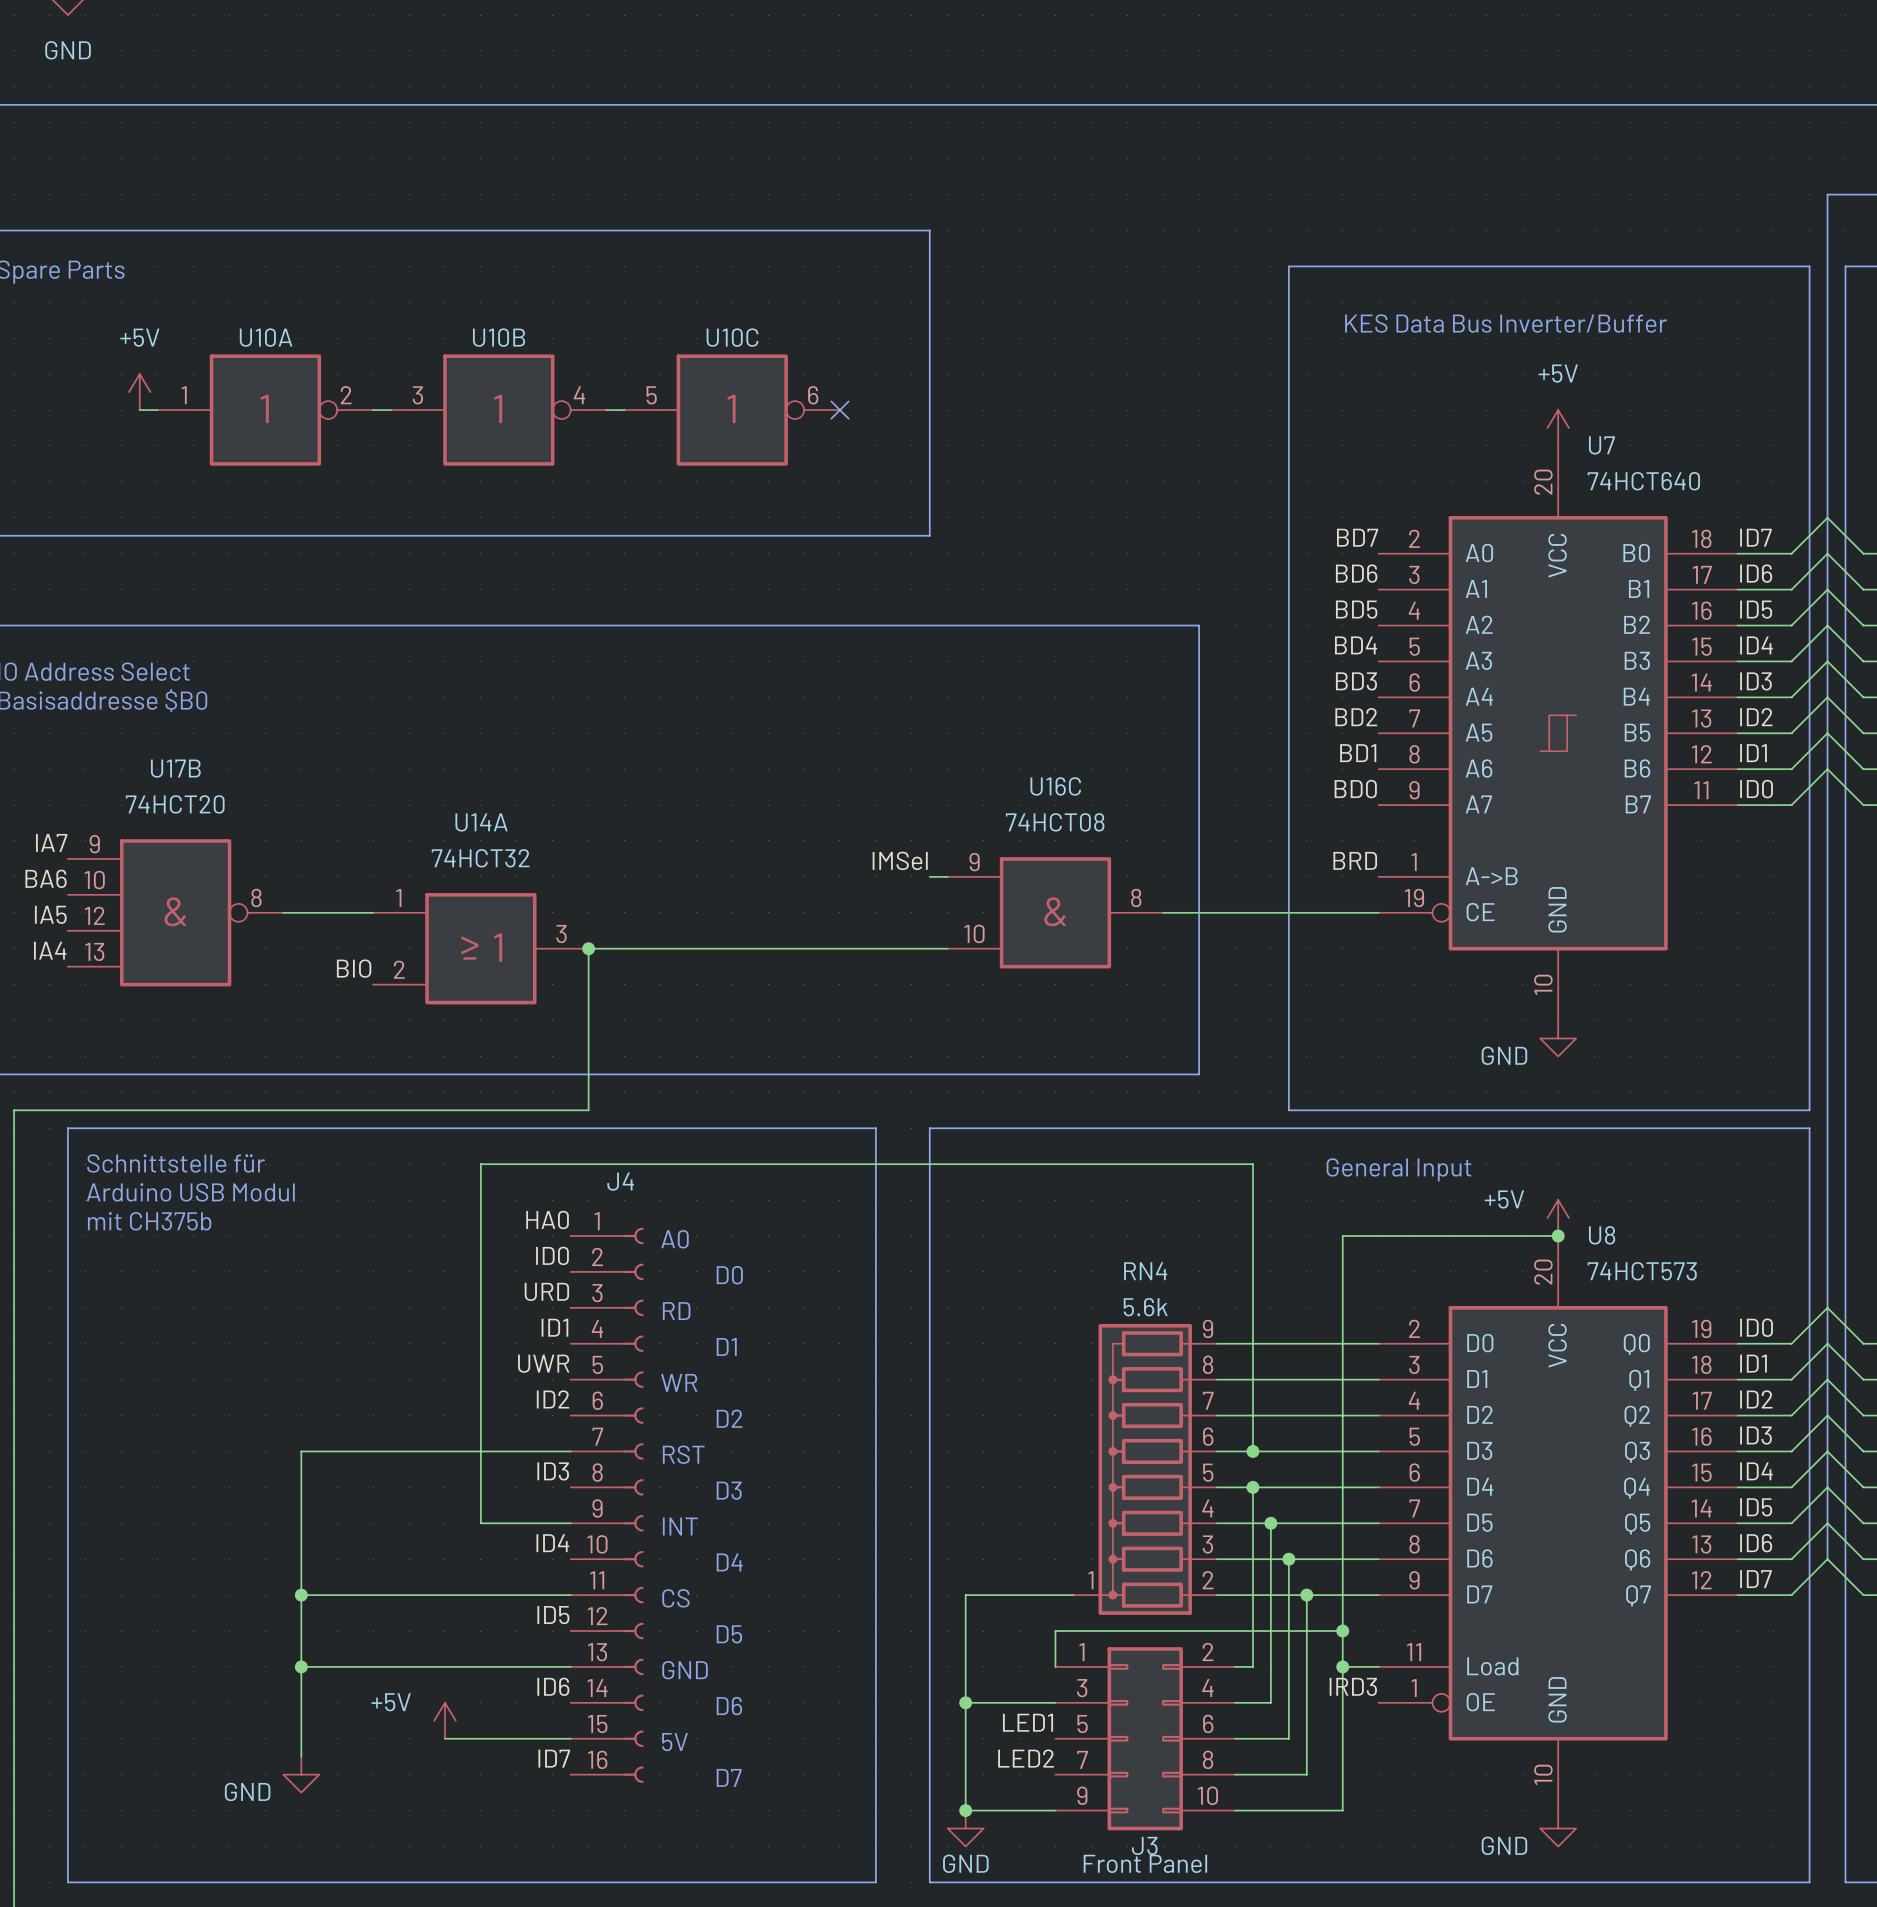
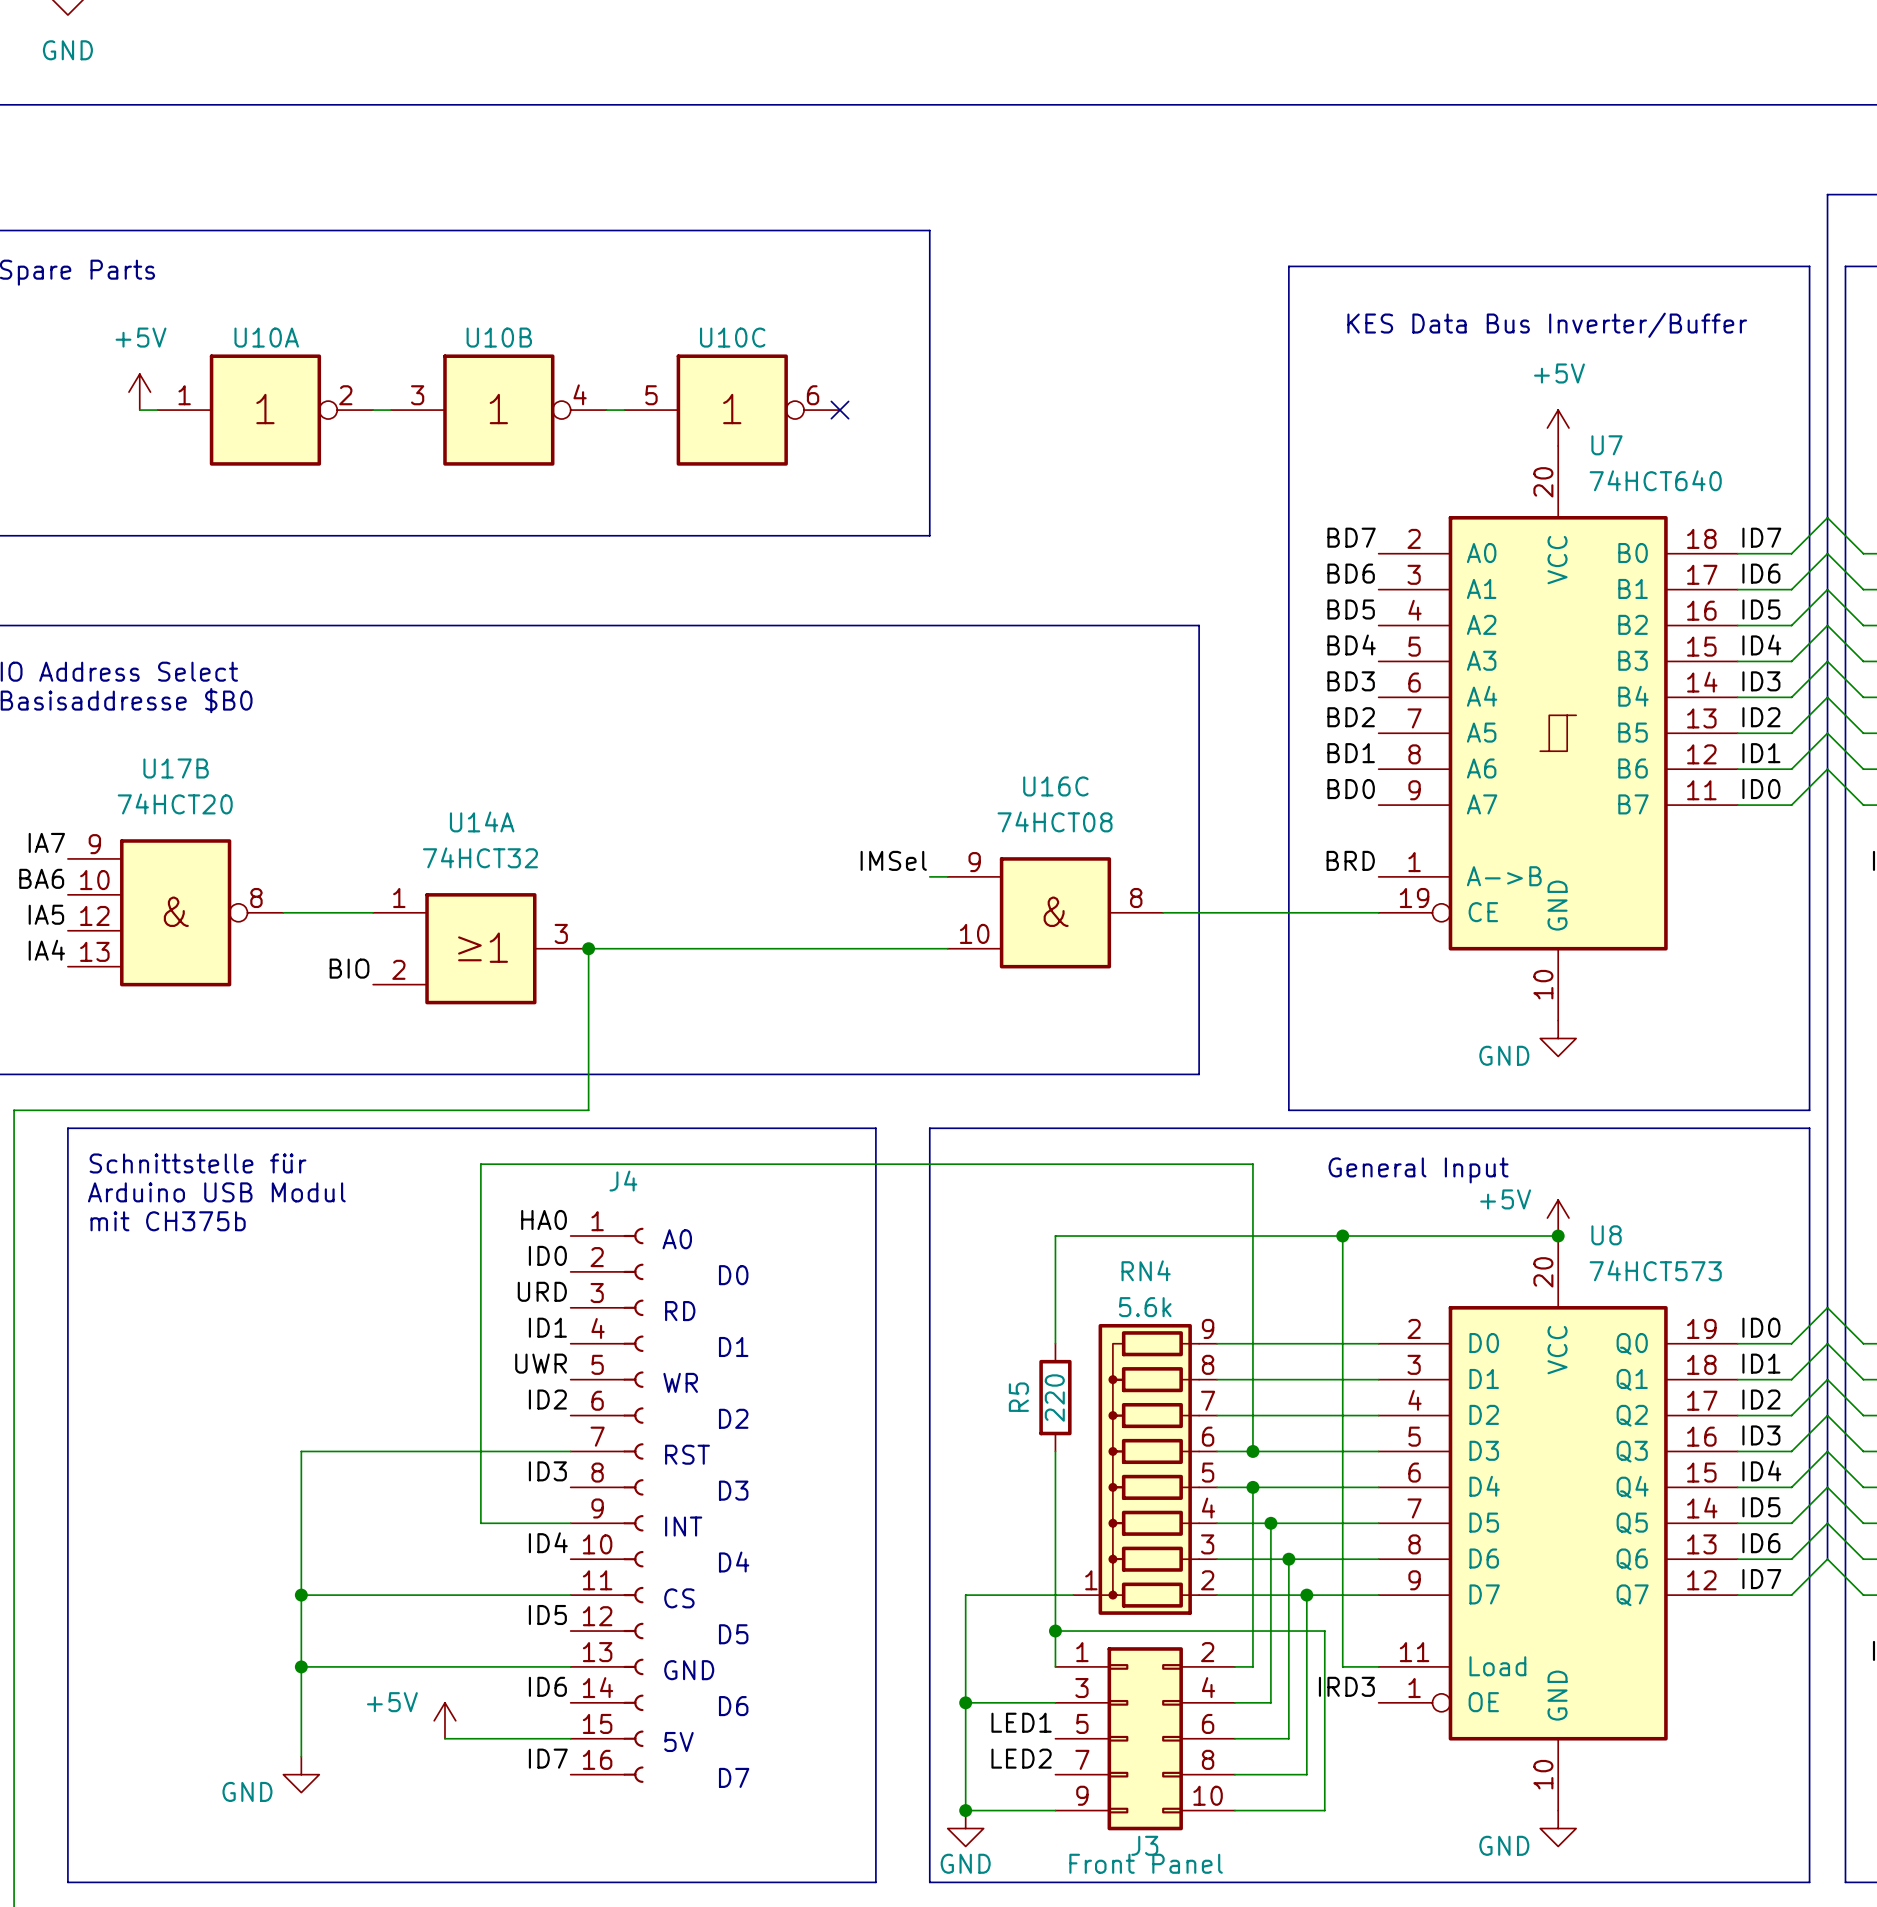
wire: none -> (1342, 1236) (1055, 1236) (1055, 1343)
junction: none -> (1342, 1236)
R5: none -> 220 (1055, 1397)
wire: none -> (1055, 1451) (1055, 1631)
junction: none -> (1055, 1631)
wire: (1324, 1631) (1342, 1631) -> none
junction: (1342, 1631) -> none
wire: (1342, 1666) (1342, 1810) (1324, 1810) -> (1324, 1631) (1324, 1810)
junction: (1342, 1666) -> none

